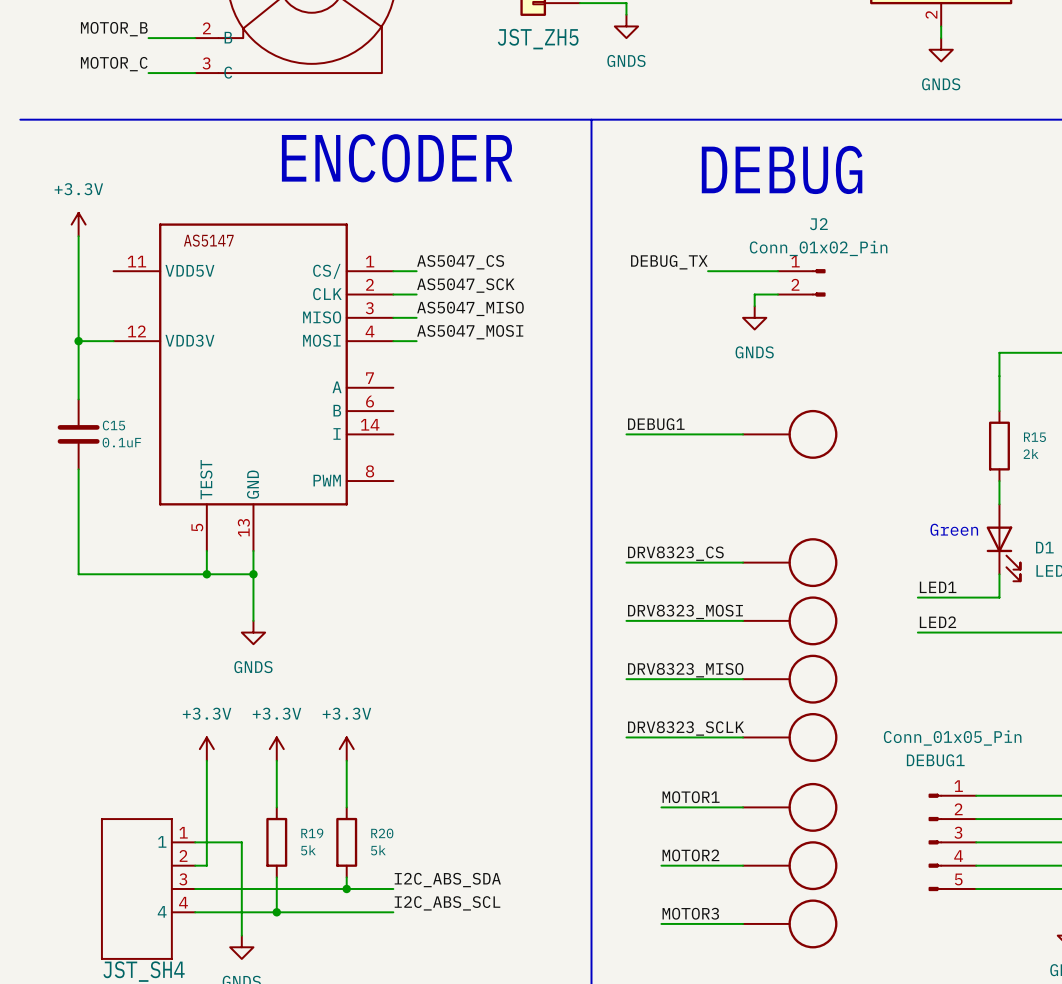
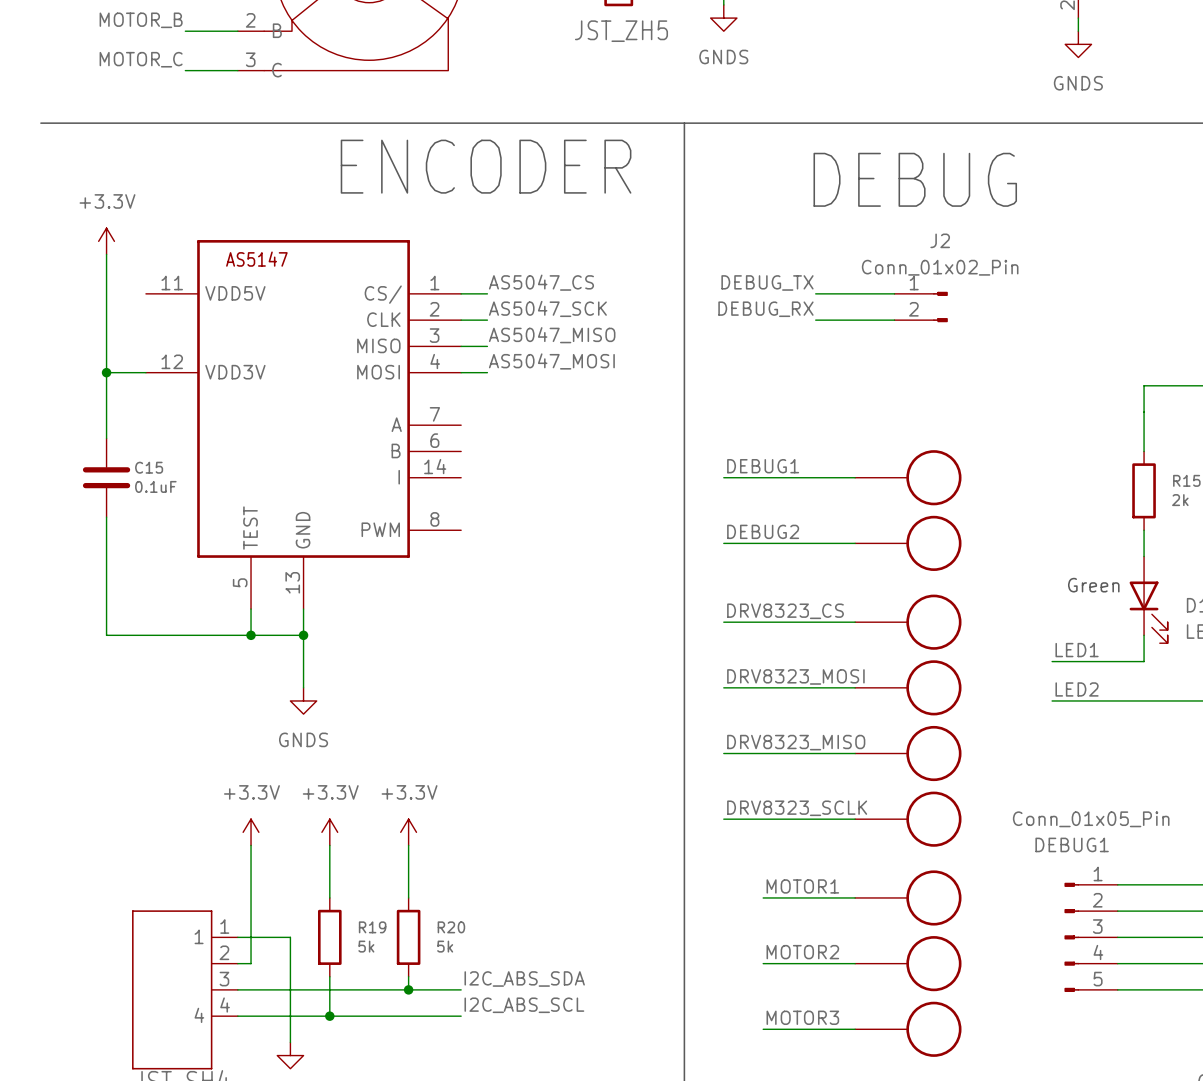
label: none -> DEBUG_RX (765, 309)
wire: (754, 294) (754, 306) -> (868, 320) (815, 320)
power symbol: GNDS (754, 317) -> none
label: none -> DEBUG2 (763, 531)
wire: none -> (723, 543) (855, 543)
part: none -> (908, 543)

